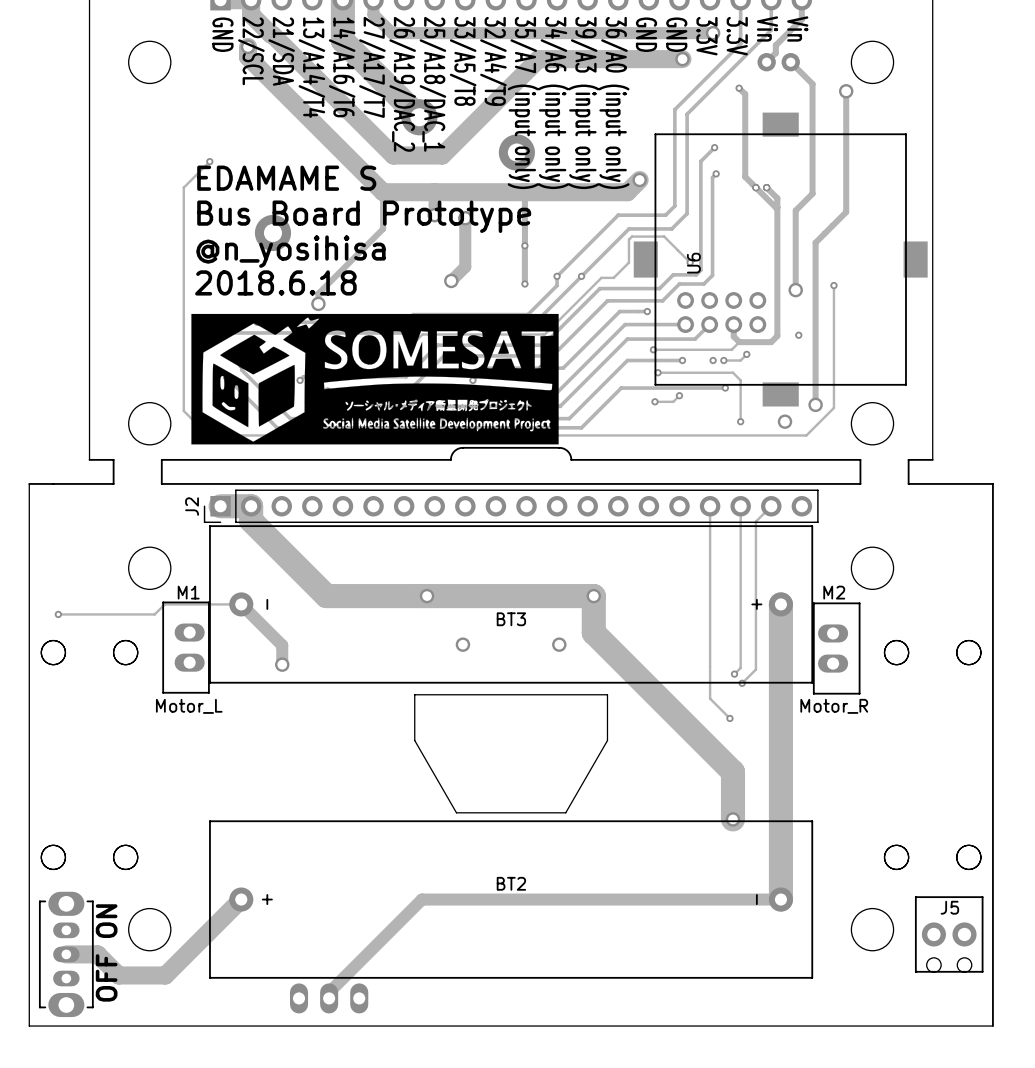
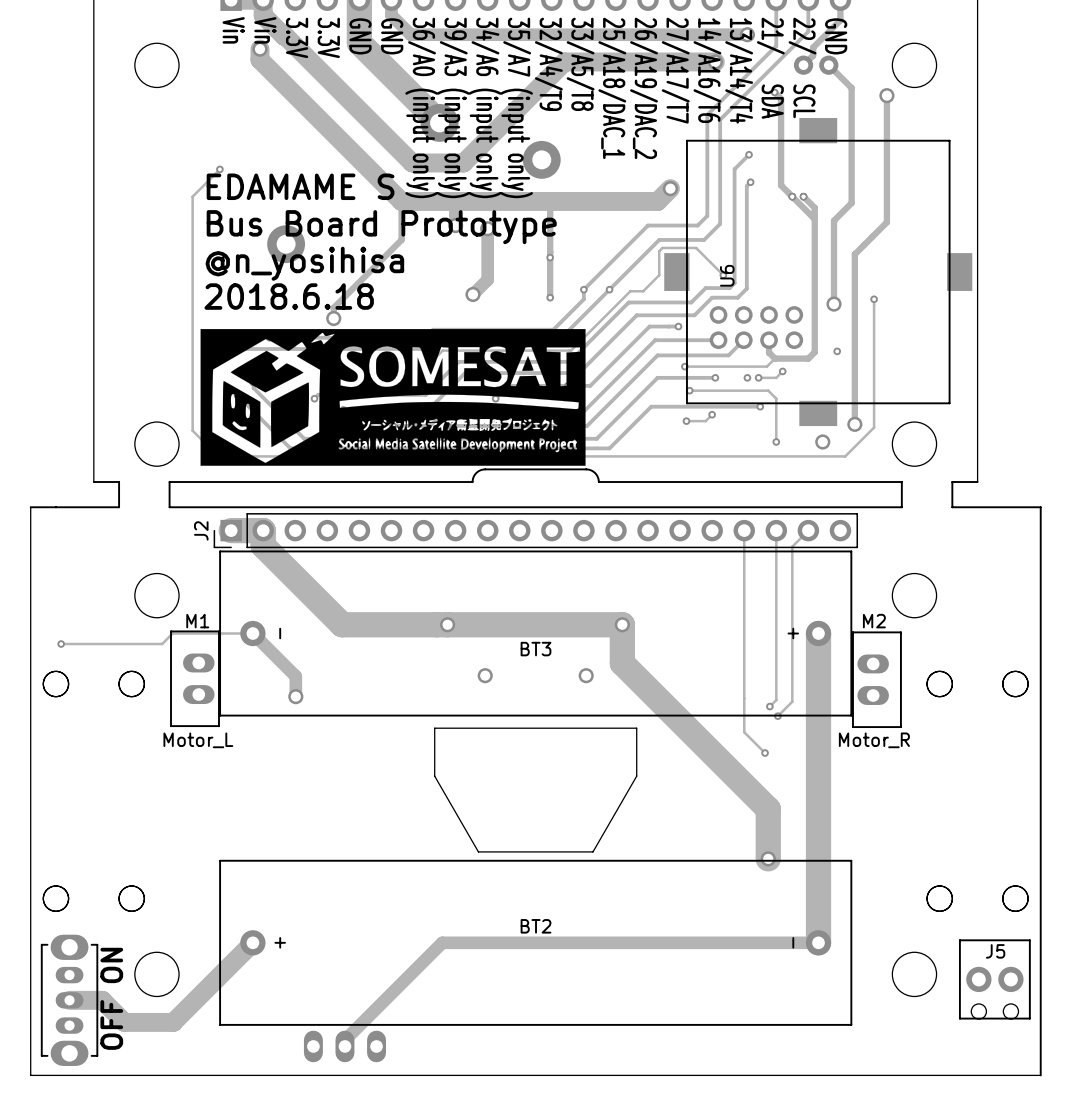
text: Vin (767, 28) -> 22/ SCL (802, 67)
text: Vin (797, 28) -> GND (836, 36)
text: GND (222, 34) -> Vin (233, 30)
text: GND (646, 34) -> 27/A17/T7 (675, 70)
text: GND (676, 34) -> 14/A16/T6 (707, 70)
text: 3.3V (707, 36) -> 13/A14/T4 (739, 70)
text: 3.3V (737, 36) -> 21/ SDA (770, 68)
text: 22/SCL (251, 51) -> Vin (265, 30)
text: 21/SDA (281, 51) -> 3.3V (297, 37)
text: 33/A5/T8 (463, 61) -> 34/A6 (input only) (485, 107)
text: 32/A4/T9 (493, 61) -> 35/A7 (input only) (516, 107)
text: 13/A14/T4 (311, 67) -> 3.3V (328, 37)
text: 14/A16/T6 (342, 67) -> GND (360, 36)
text: 27/A17/T7 (372, 67) -> GND (392, 36)
text: 26/A19/DAC_2 (402, 84) -> 36/A0 (input only) (421, 107)
text: 25/A18/DAC_1 (432, 84) -> 39/A3 (input only) (453, 107)
text: 35/A7 (input only) (523, 102) -> 32/A4/T9 (548, 64)
text: 34/A6 (input only) (553, 102) -> 33/A5/T8 (580, 64)
text: 39/A3 (input only) (583, 102) -> 25/A18/DAC_1 (612, 88)
text: 36/A0 (input only) (614, 102) -> 26/A19/DAC_2 (644, 88)

